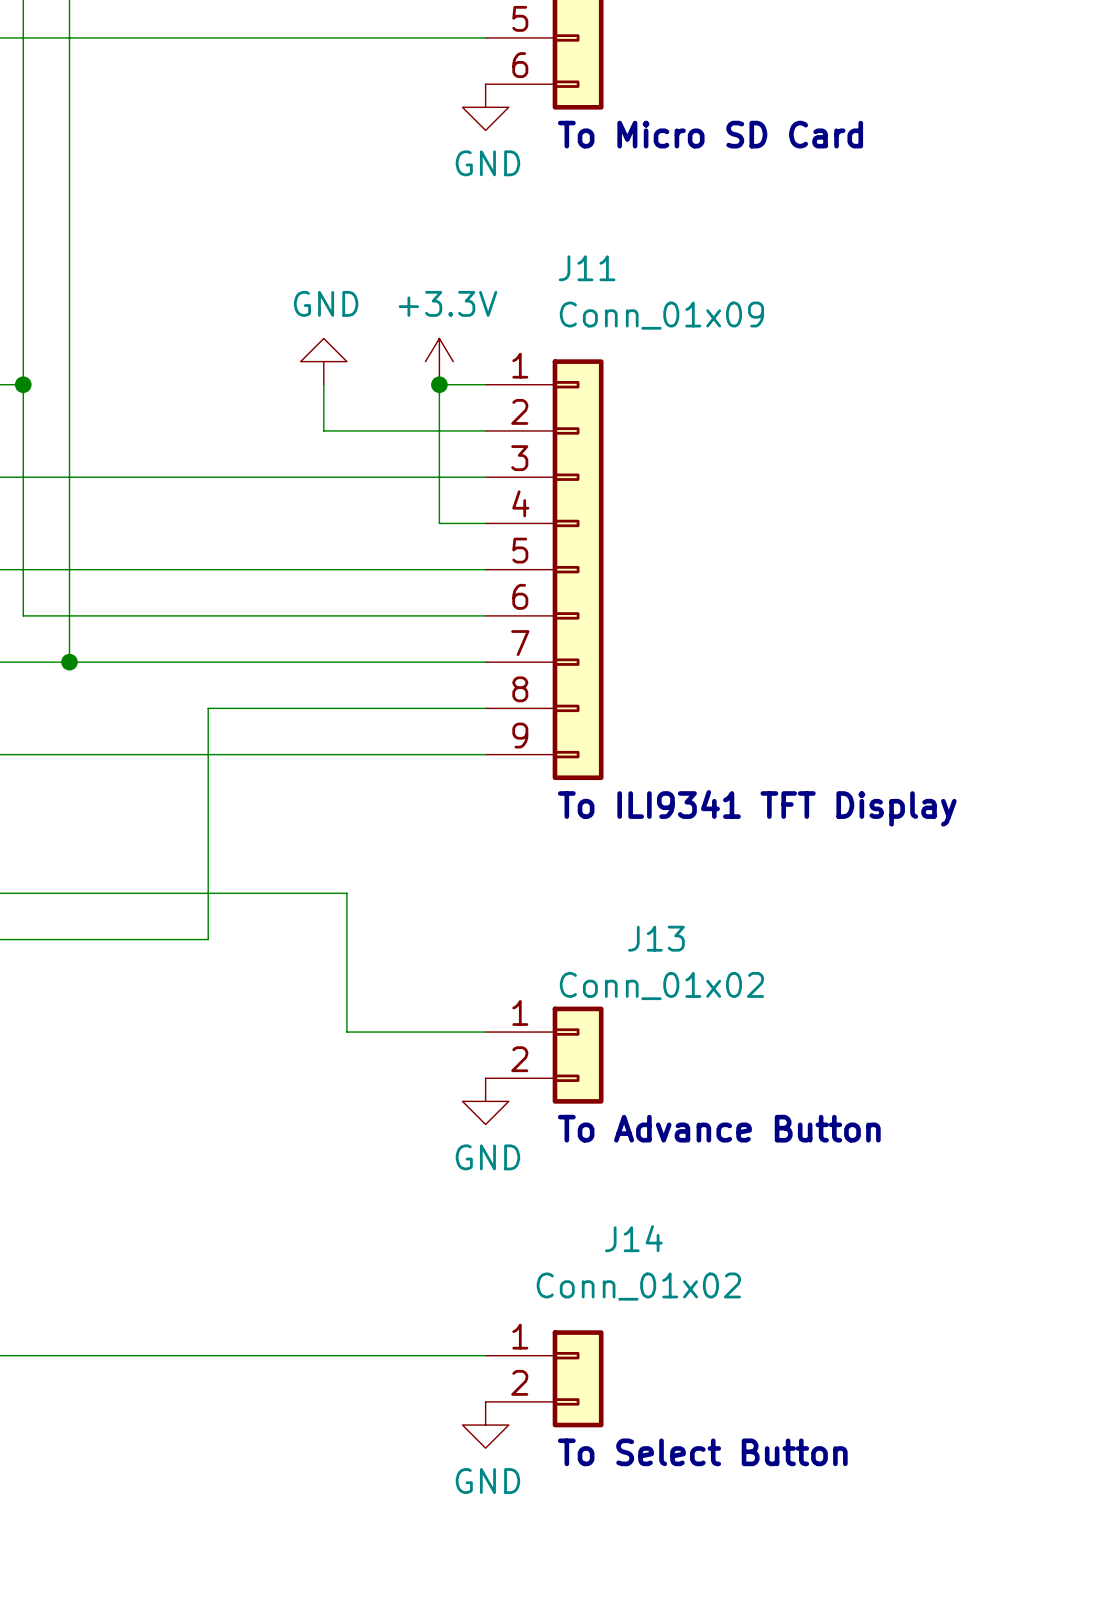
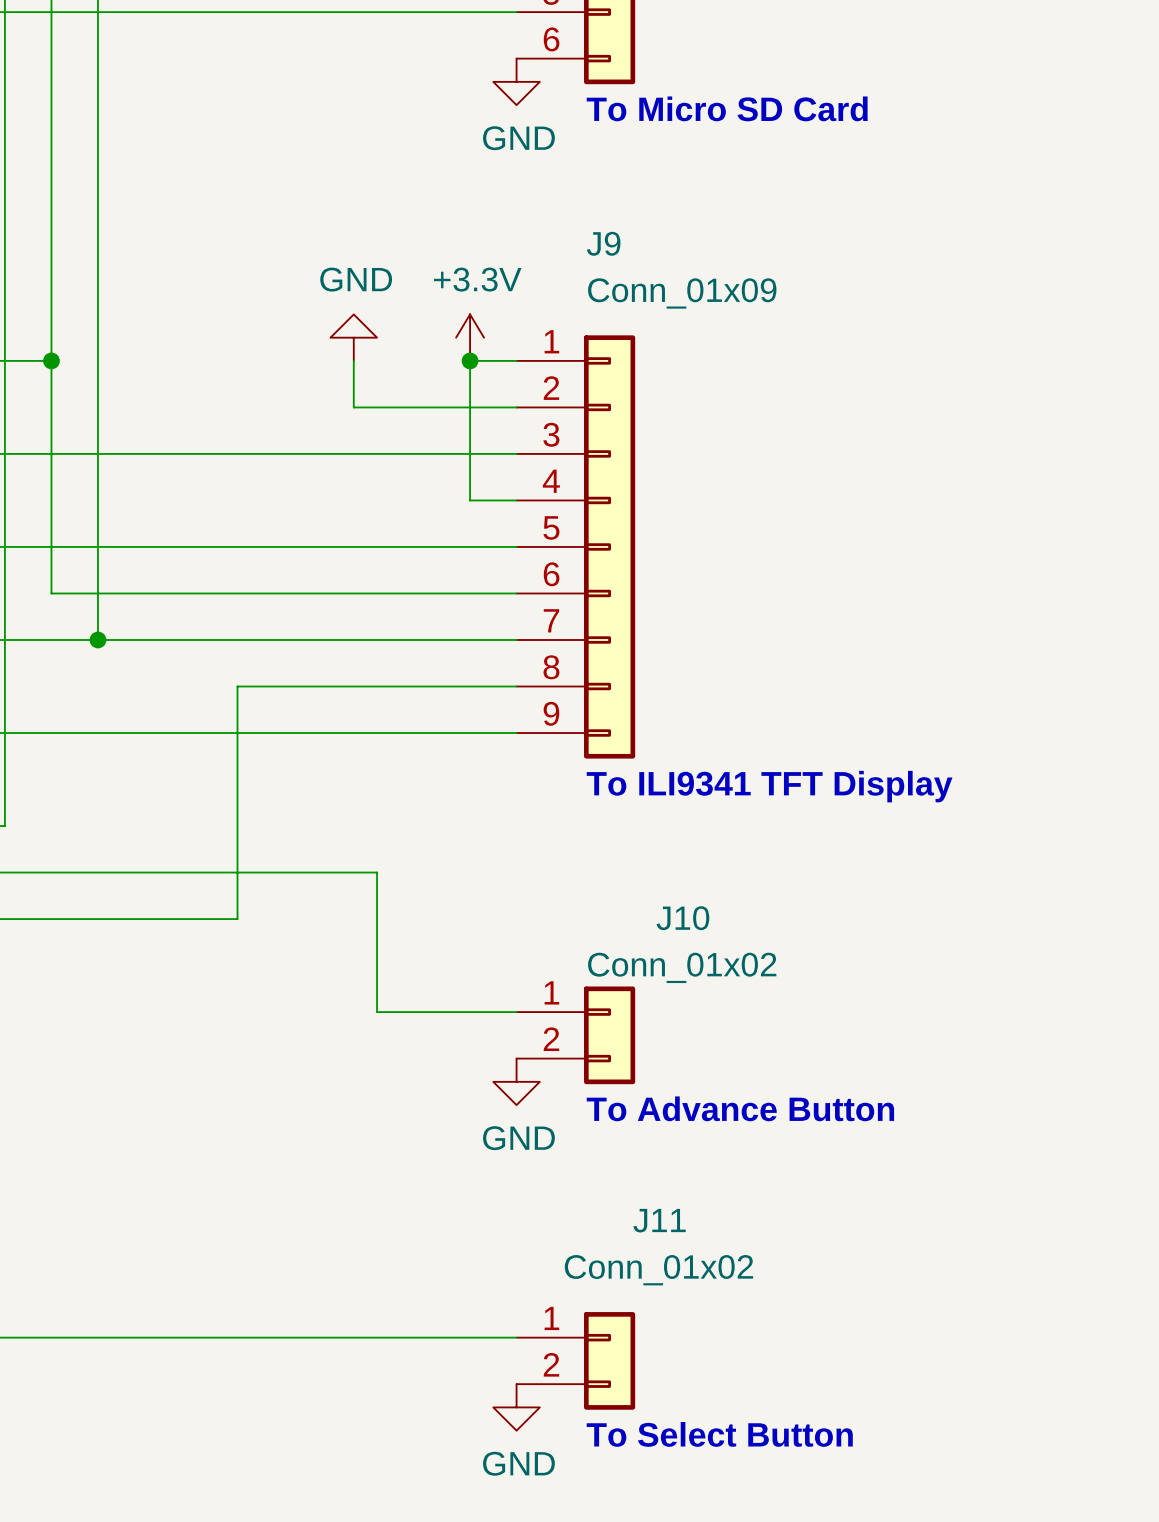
J11 name: J11 (587, 268) -> J9 (603, 243)
J13 name: J13 (656, 938) -> J10 (682, 918)
J14 name: J14 (633, 1238) -> J11 (659, 1220)

